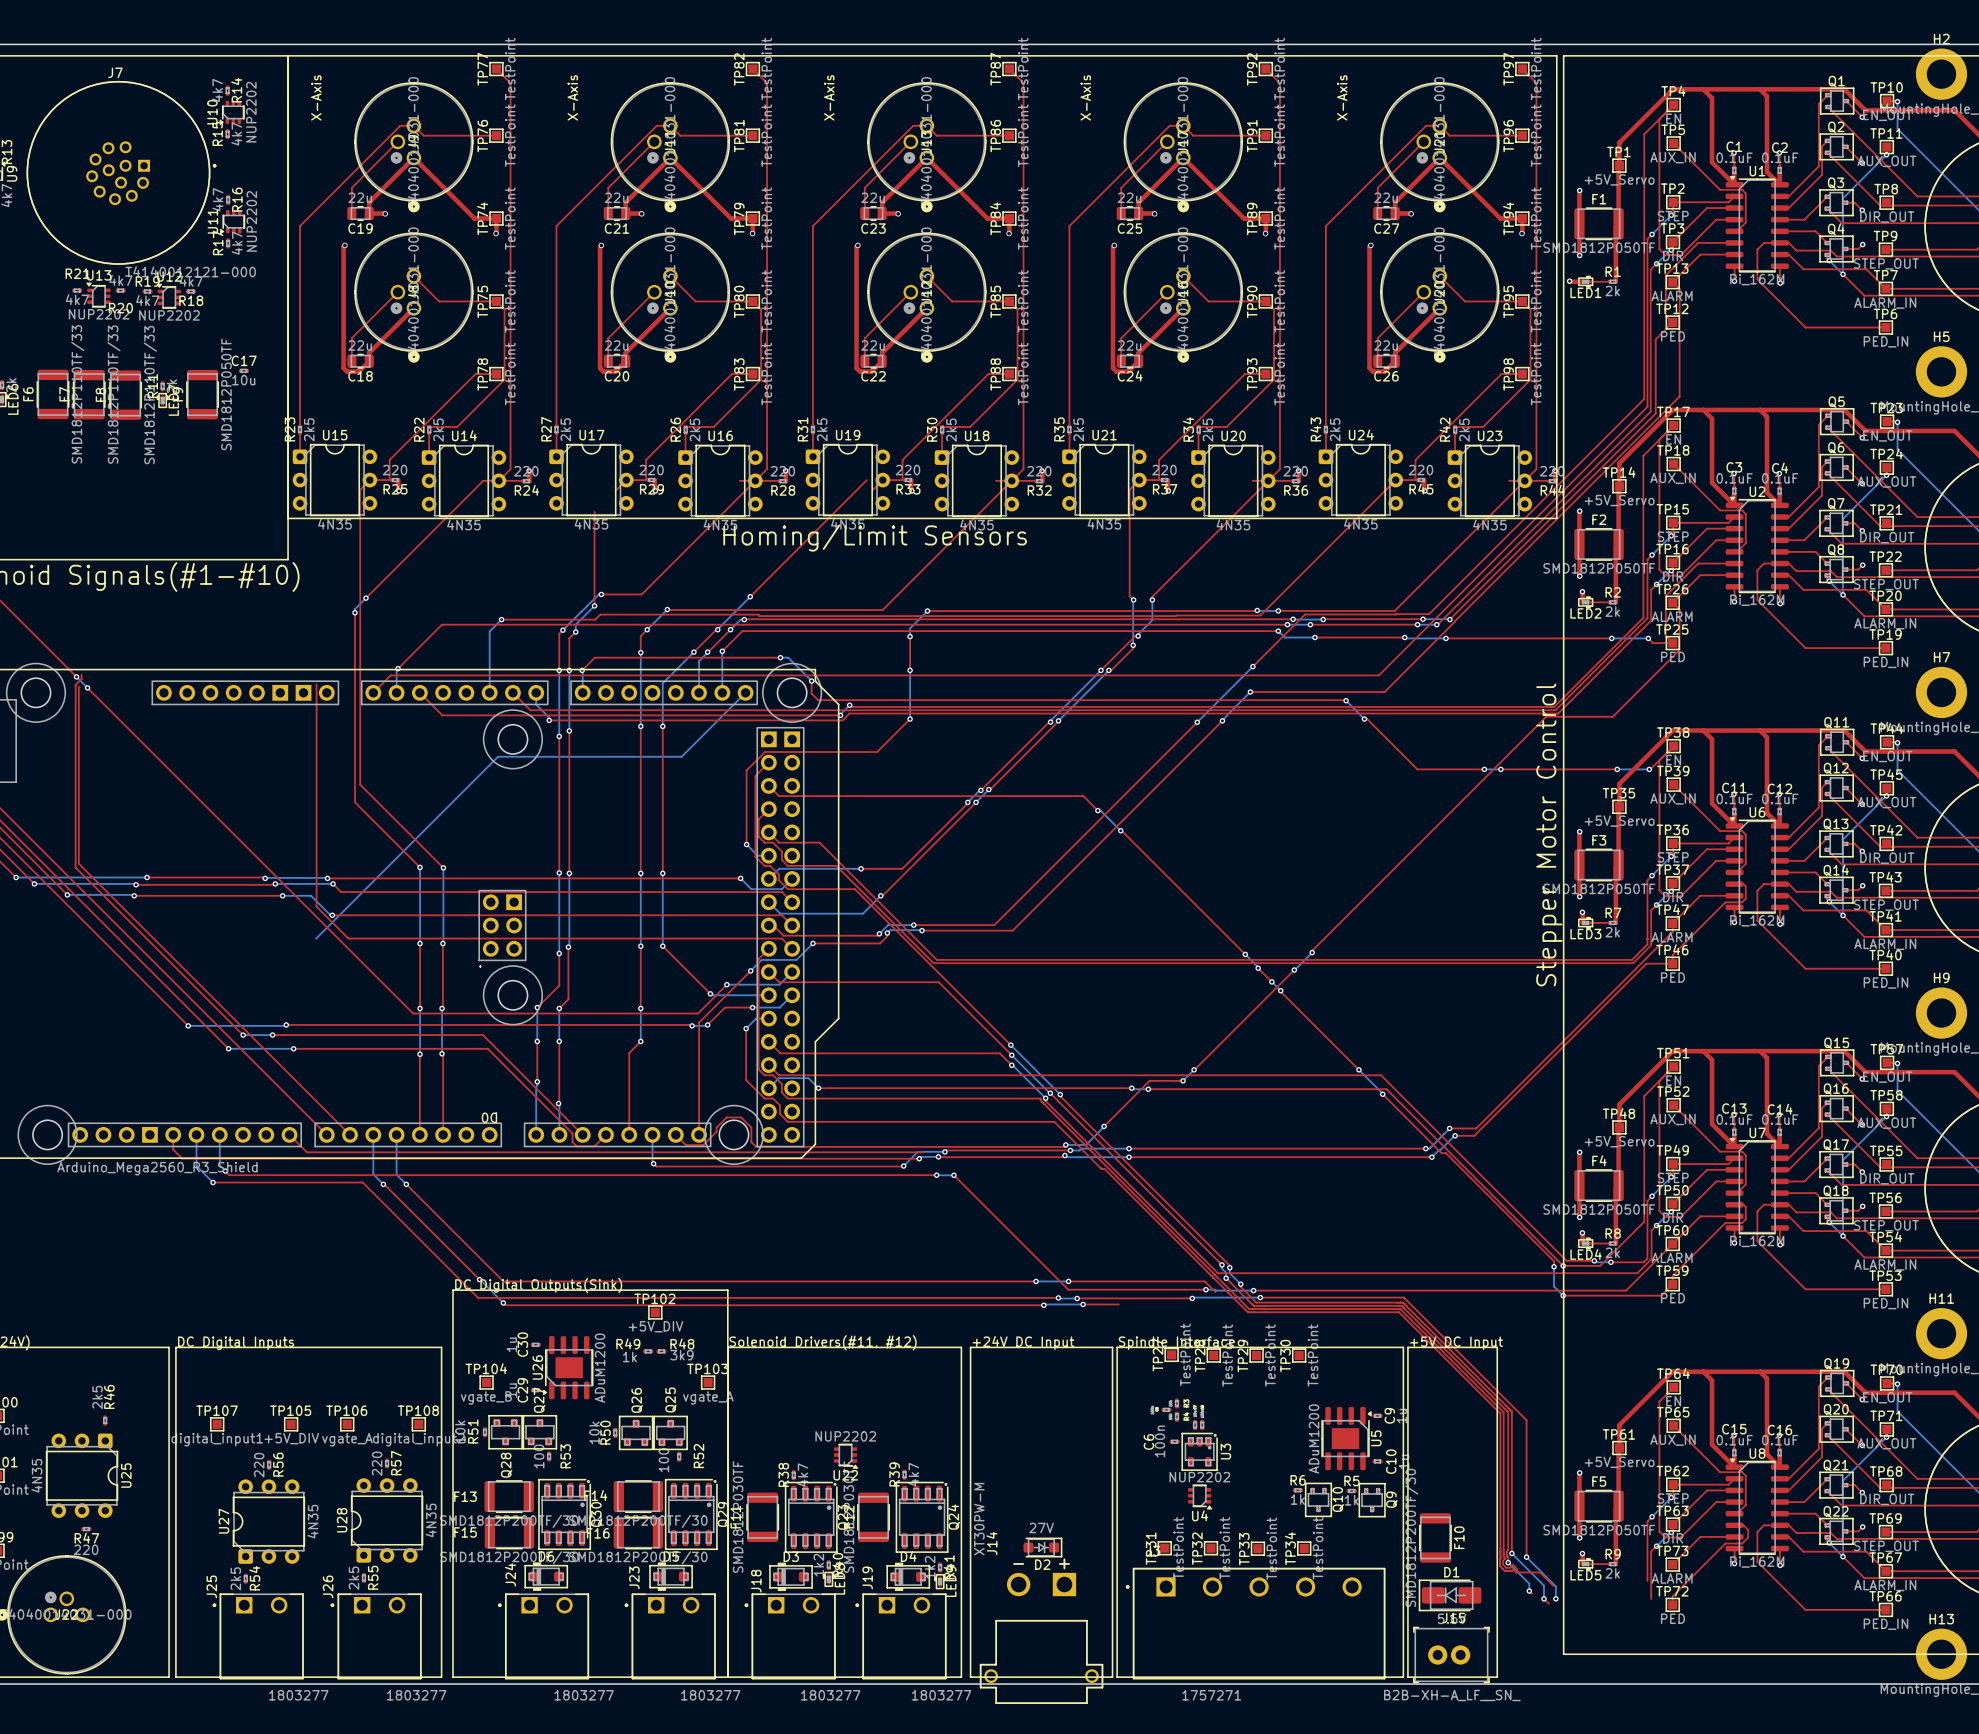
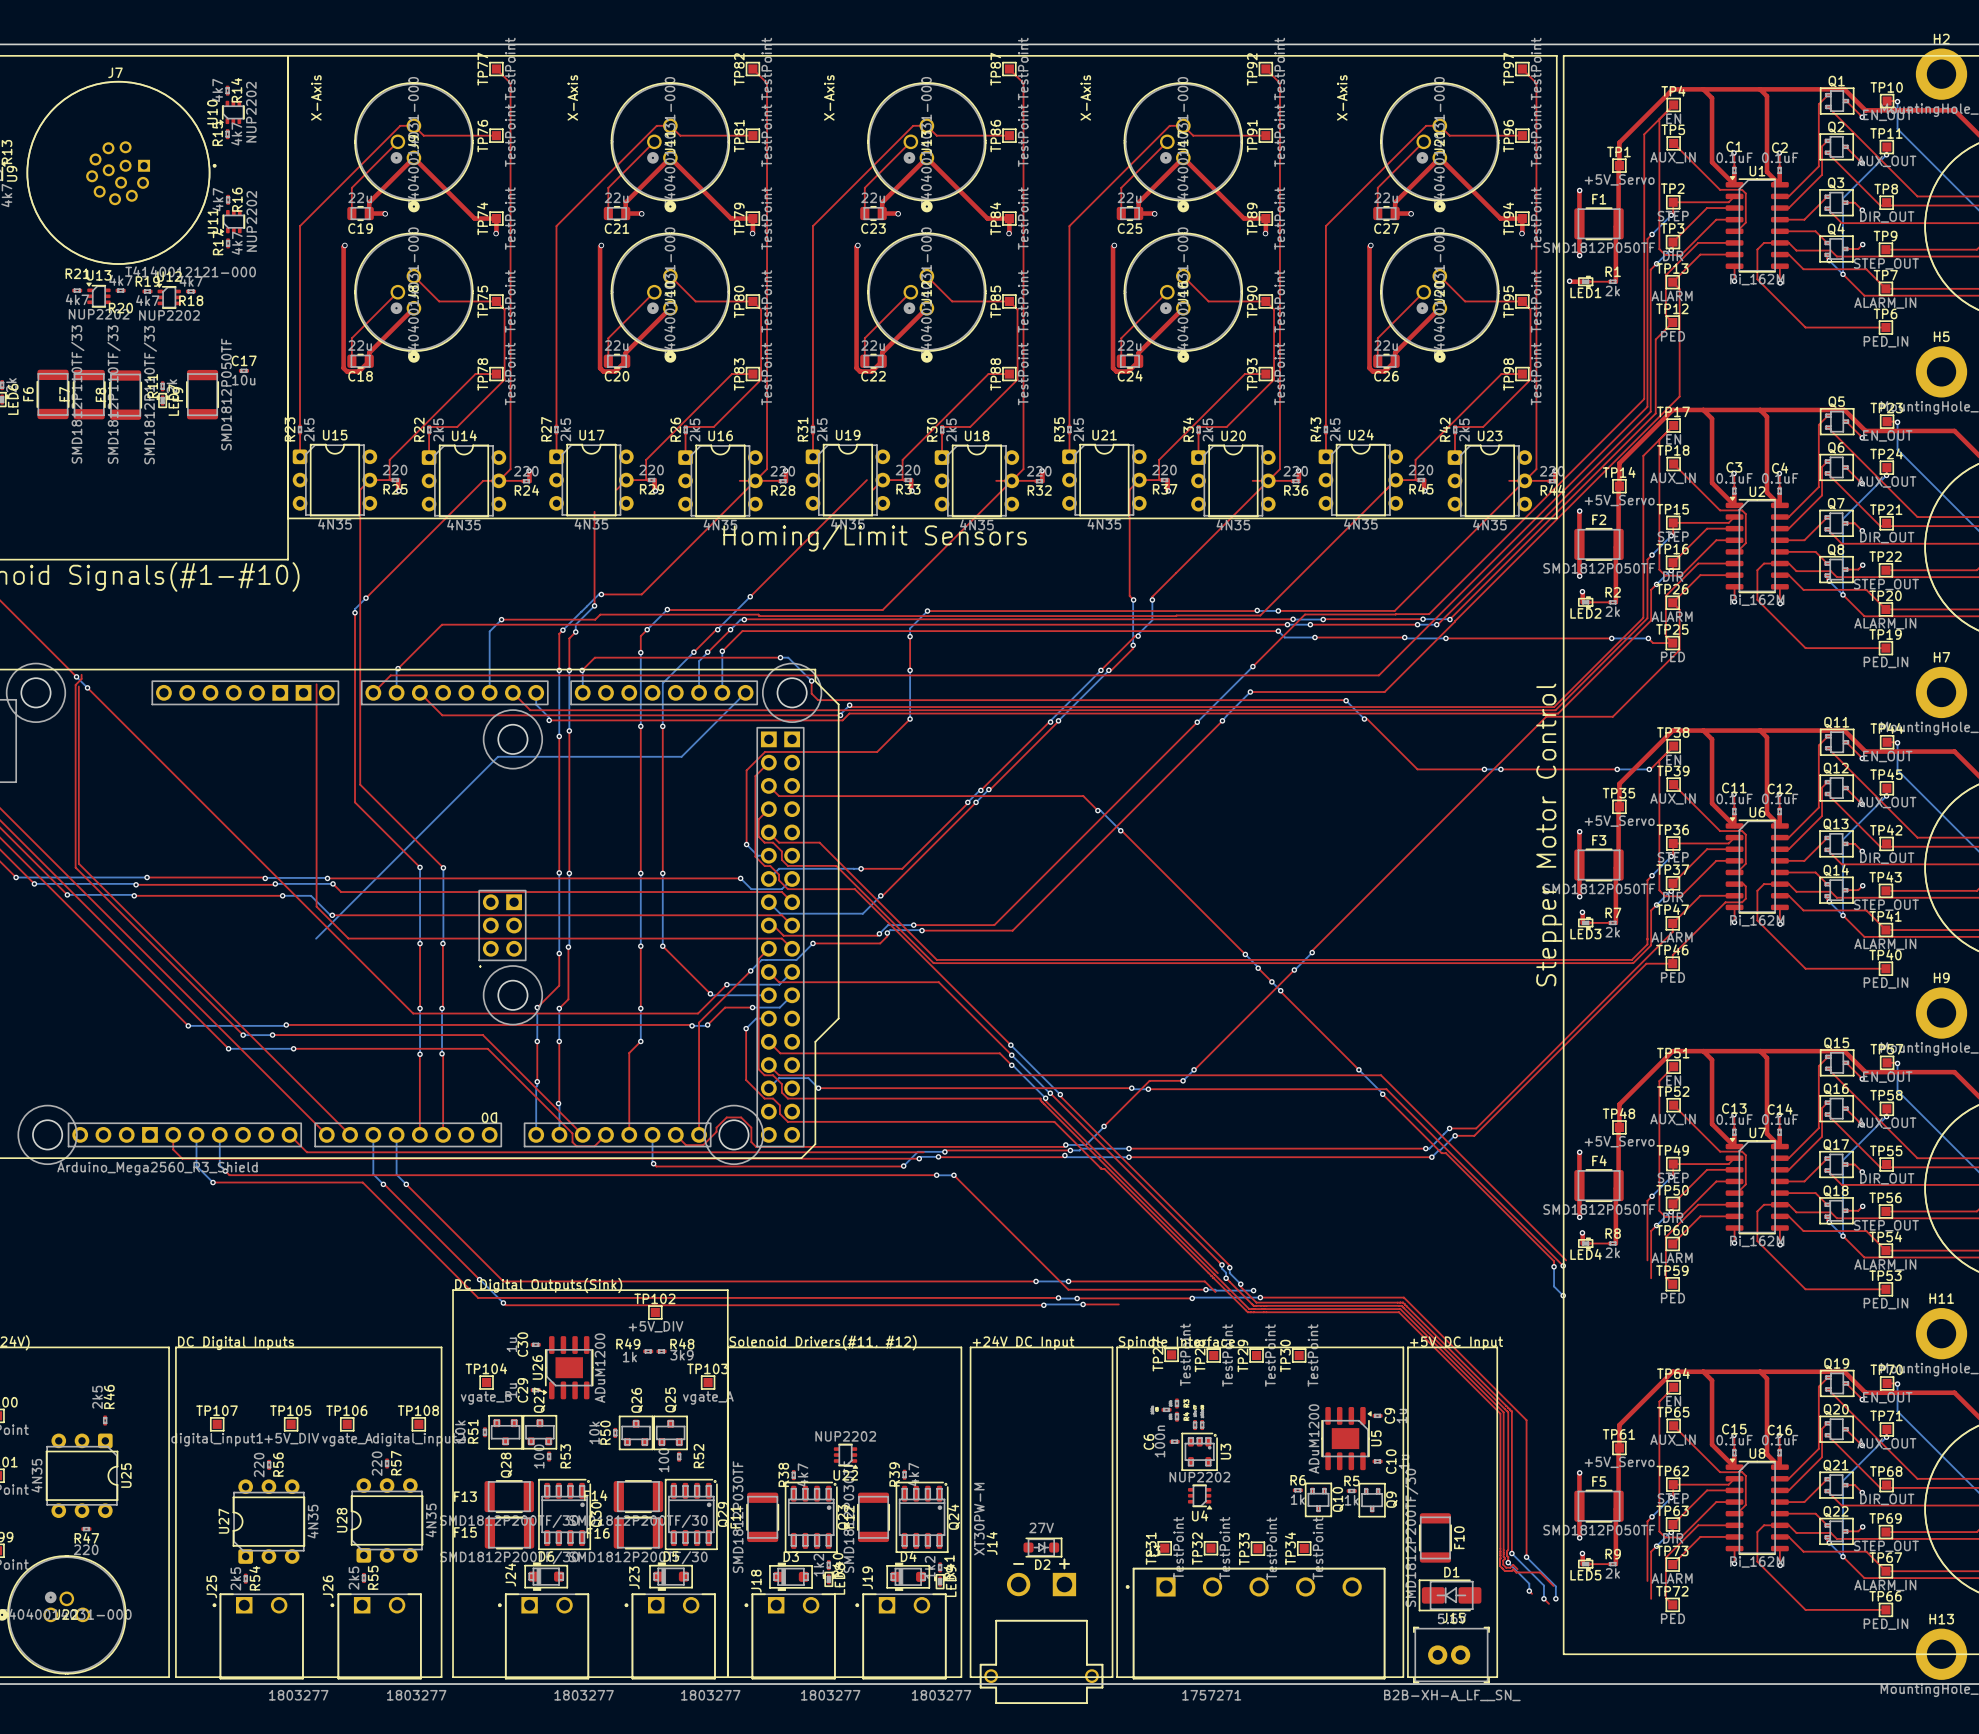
top track: (1659, 1081) (1644, 1096) (1644, 1221) (1600, 1265) (1563, 1265) -> none
top track: (1734, 1204) (1743, 1204) (1745, 1207) (1745, 1219) (1742, 1222) (1725, 1222) (1672, 1275) (1672, 1284) (1661, 1295) (1563, 1295) -> (1734, 1204) (1698, 1204) (1665, 1237) (1665, 1277) (1672, 1284)
top track: (1651, 1230) (1651, 1259) (1637, 1273) (1217, 1273) -> (1651, 1230) (1651, 1278)
top track: (1672, 1243) (1626, 1290) (1253, 1290) -> none
top track: (1647, 1258) (1643, 1262) (1610, 1262) -> (1647, 1258) (1647, 1260)
top track: (1566, 1260) (1594, 1260) -> none
bottom track: (1594, 1260) (1610, 1262) -> none
via: (1594, 1260) -> none
via: (1610, 1262) -> none
top track: (1734, 1525) (1743, 1525) (1748, 1530) (1748, 1537) (1742, 1543) (1725, 1543) (1672, 1596) (1672, 1604) -> (1734, 1525) (1698, 1525) (1665, 1557) (1665, 1598) (1672, 1604)

